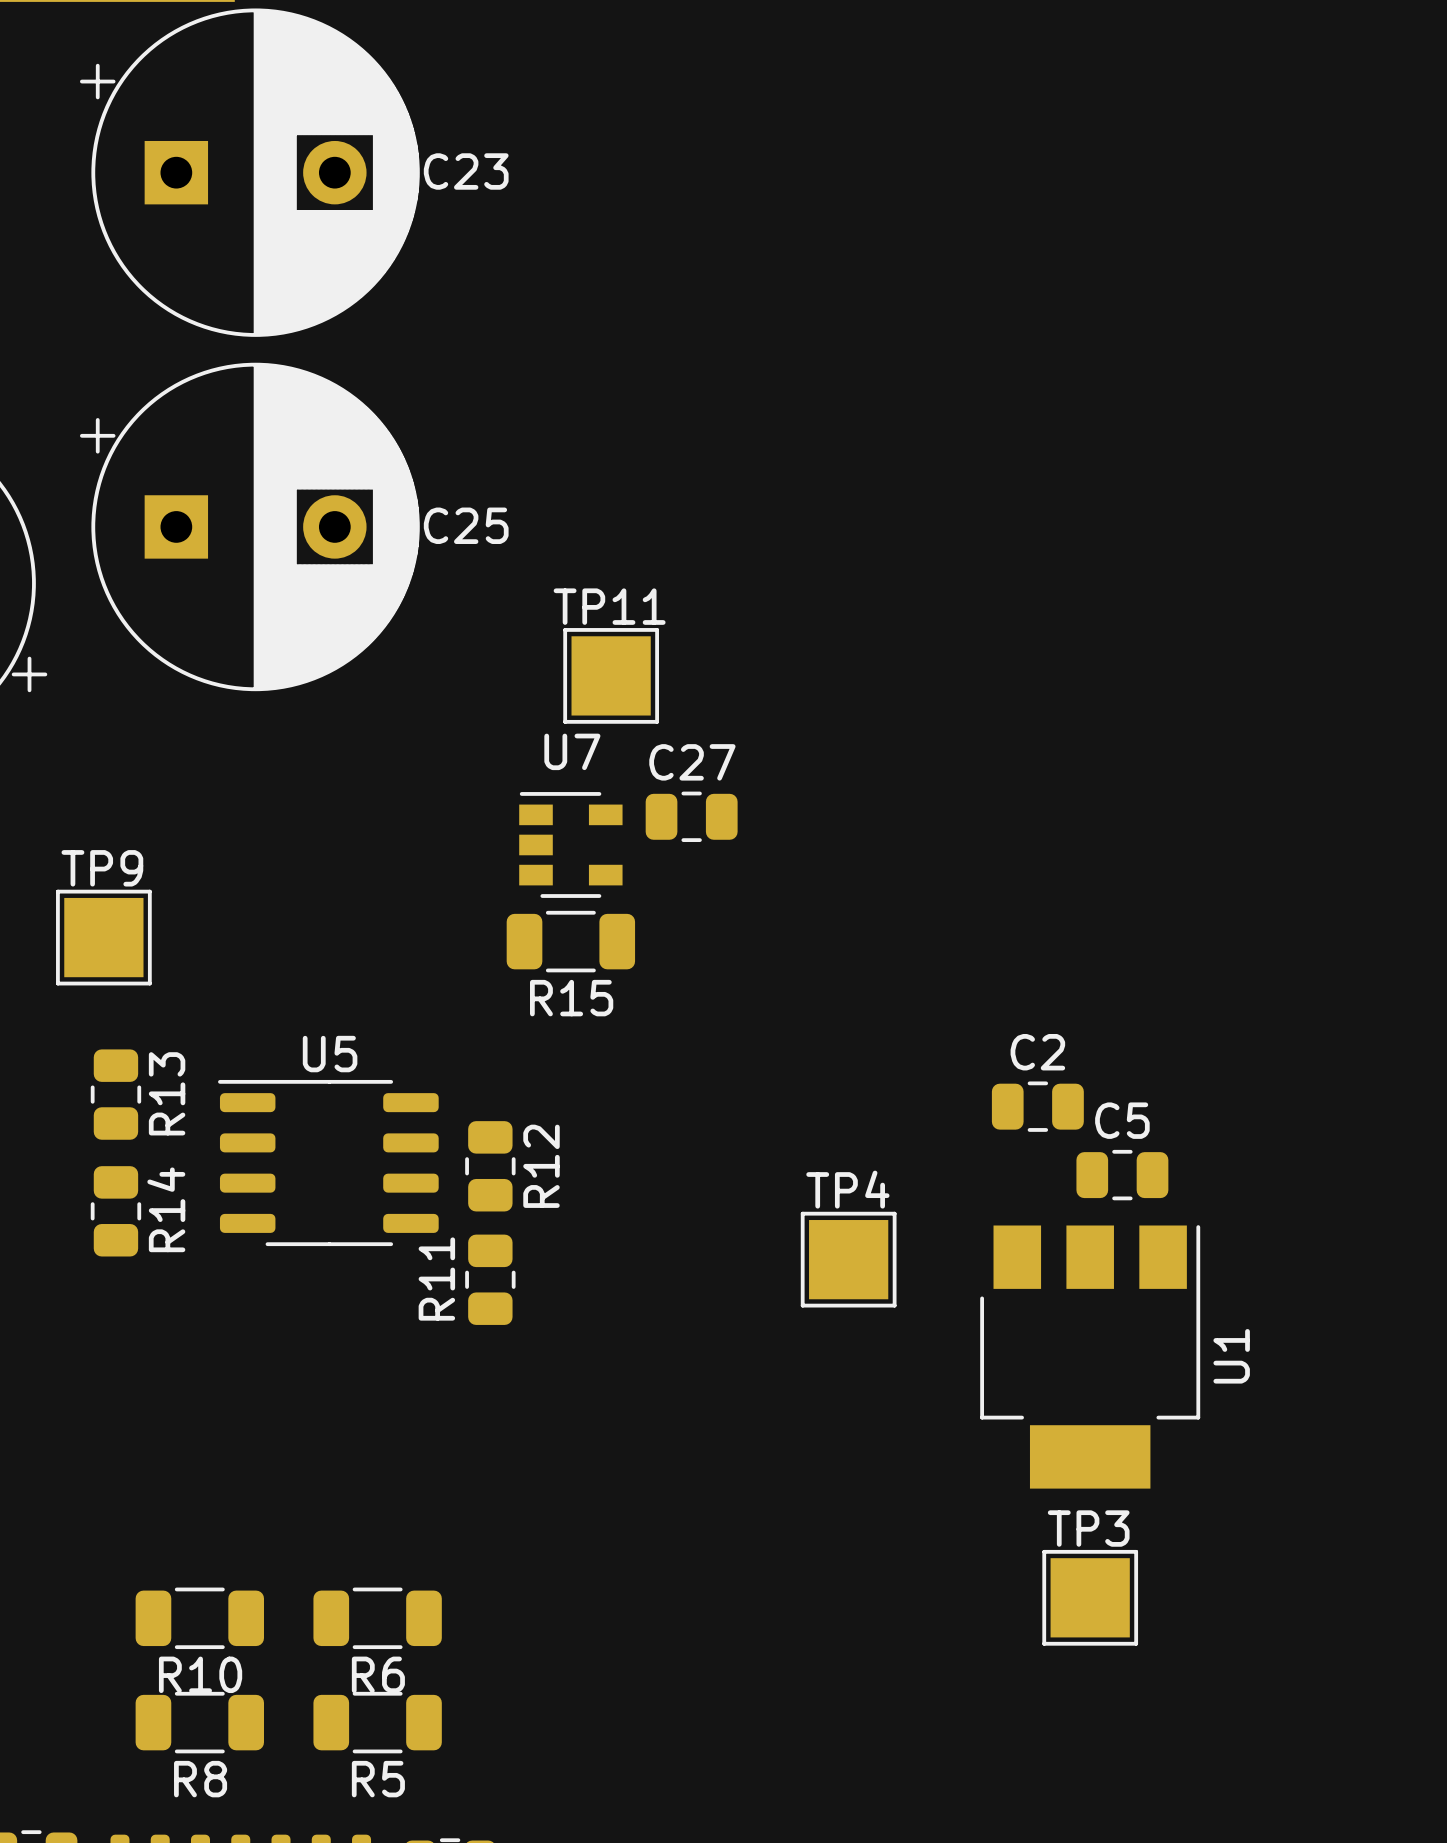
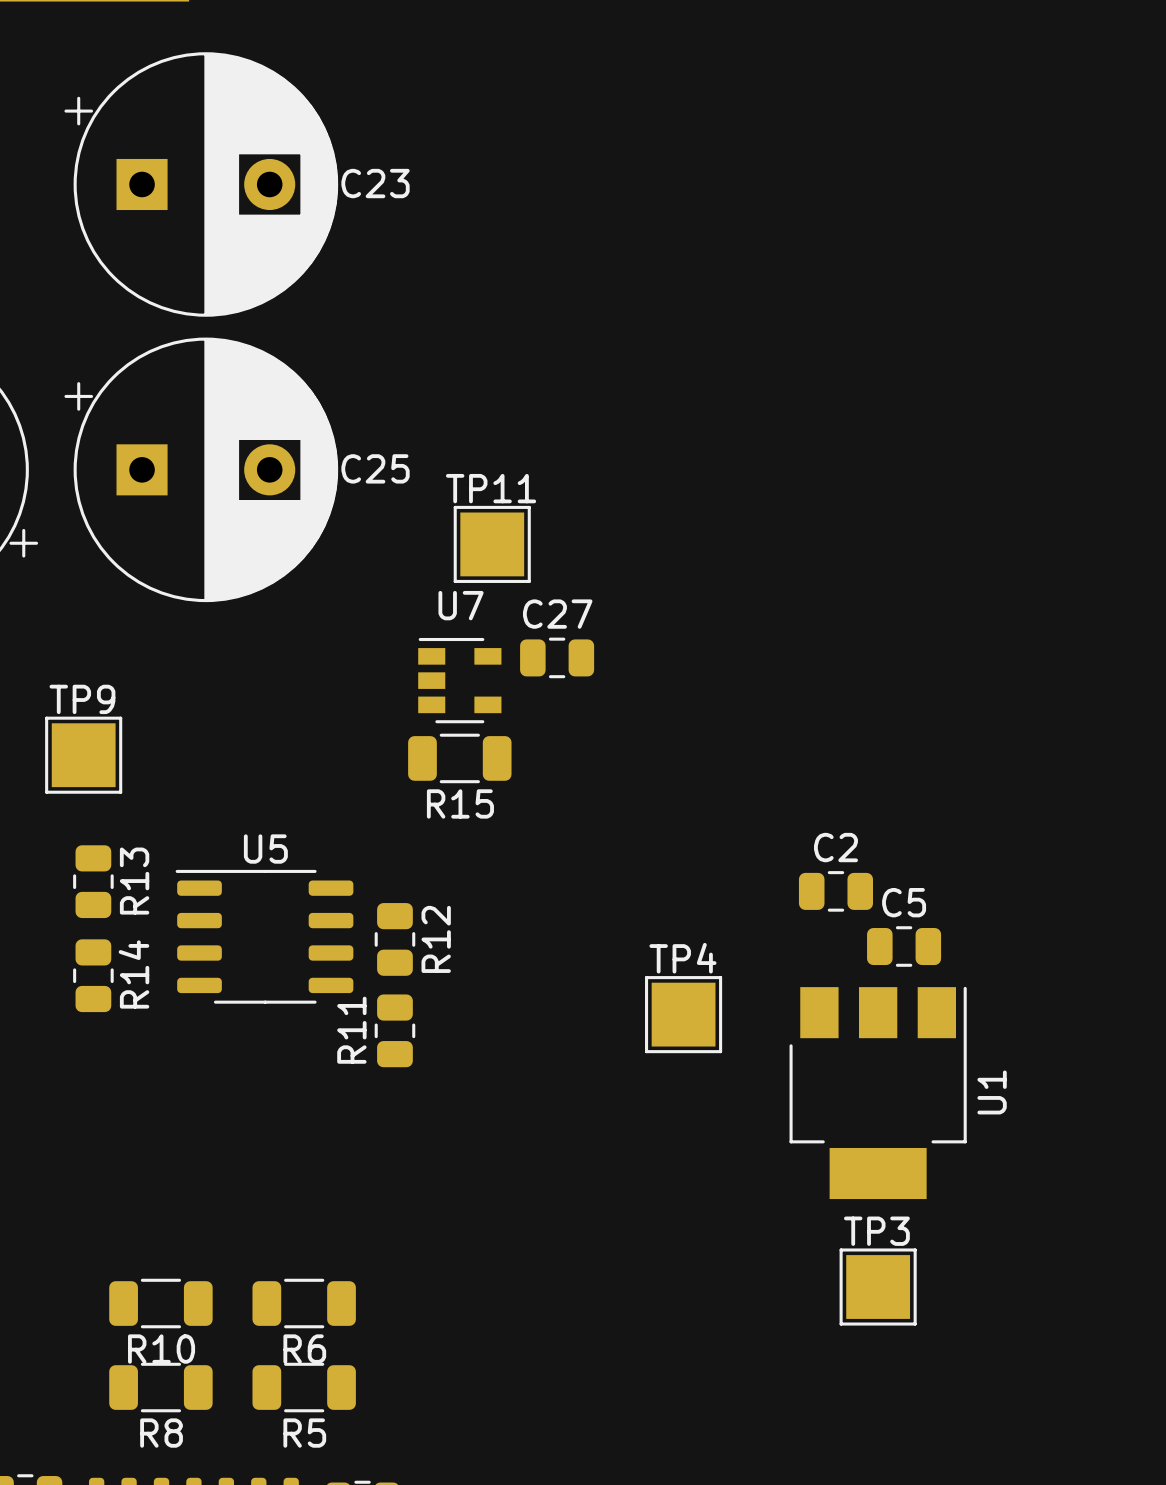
C23 position: (249, 172) -> (201, 184)
C25 position: (249, 526) -> (201, 469)

